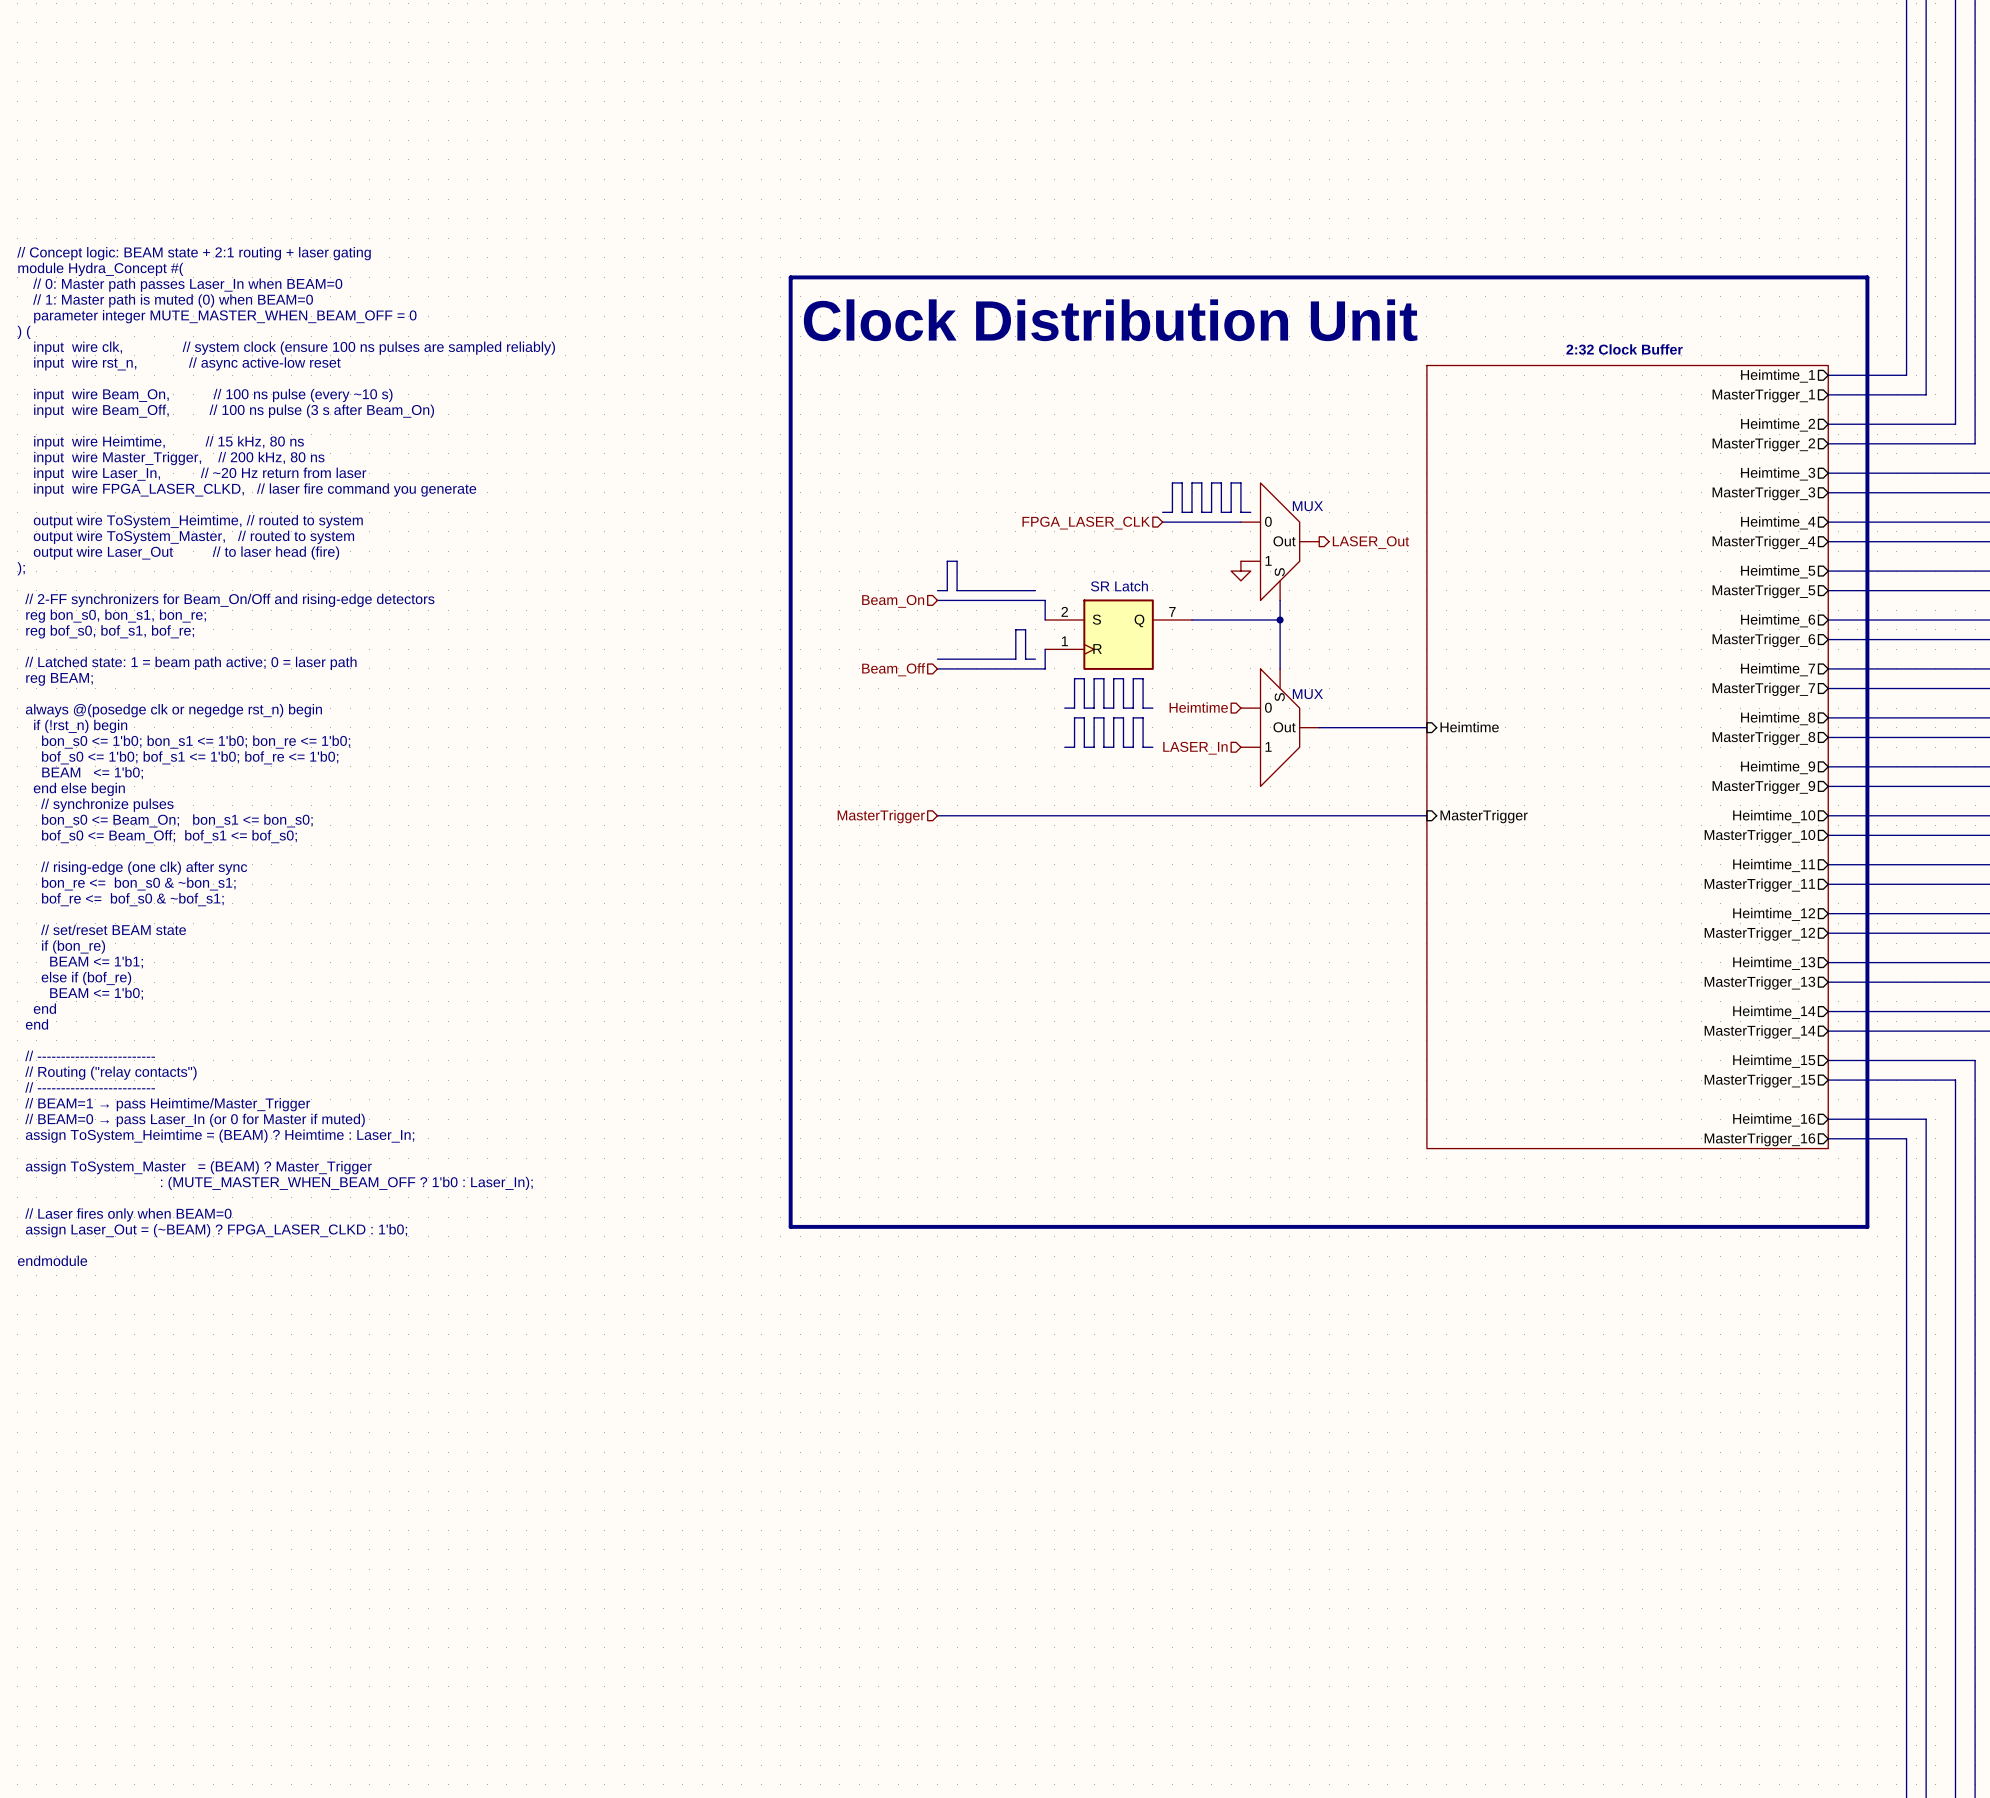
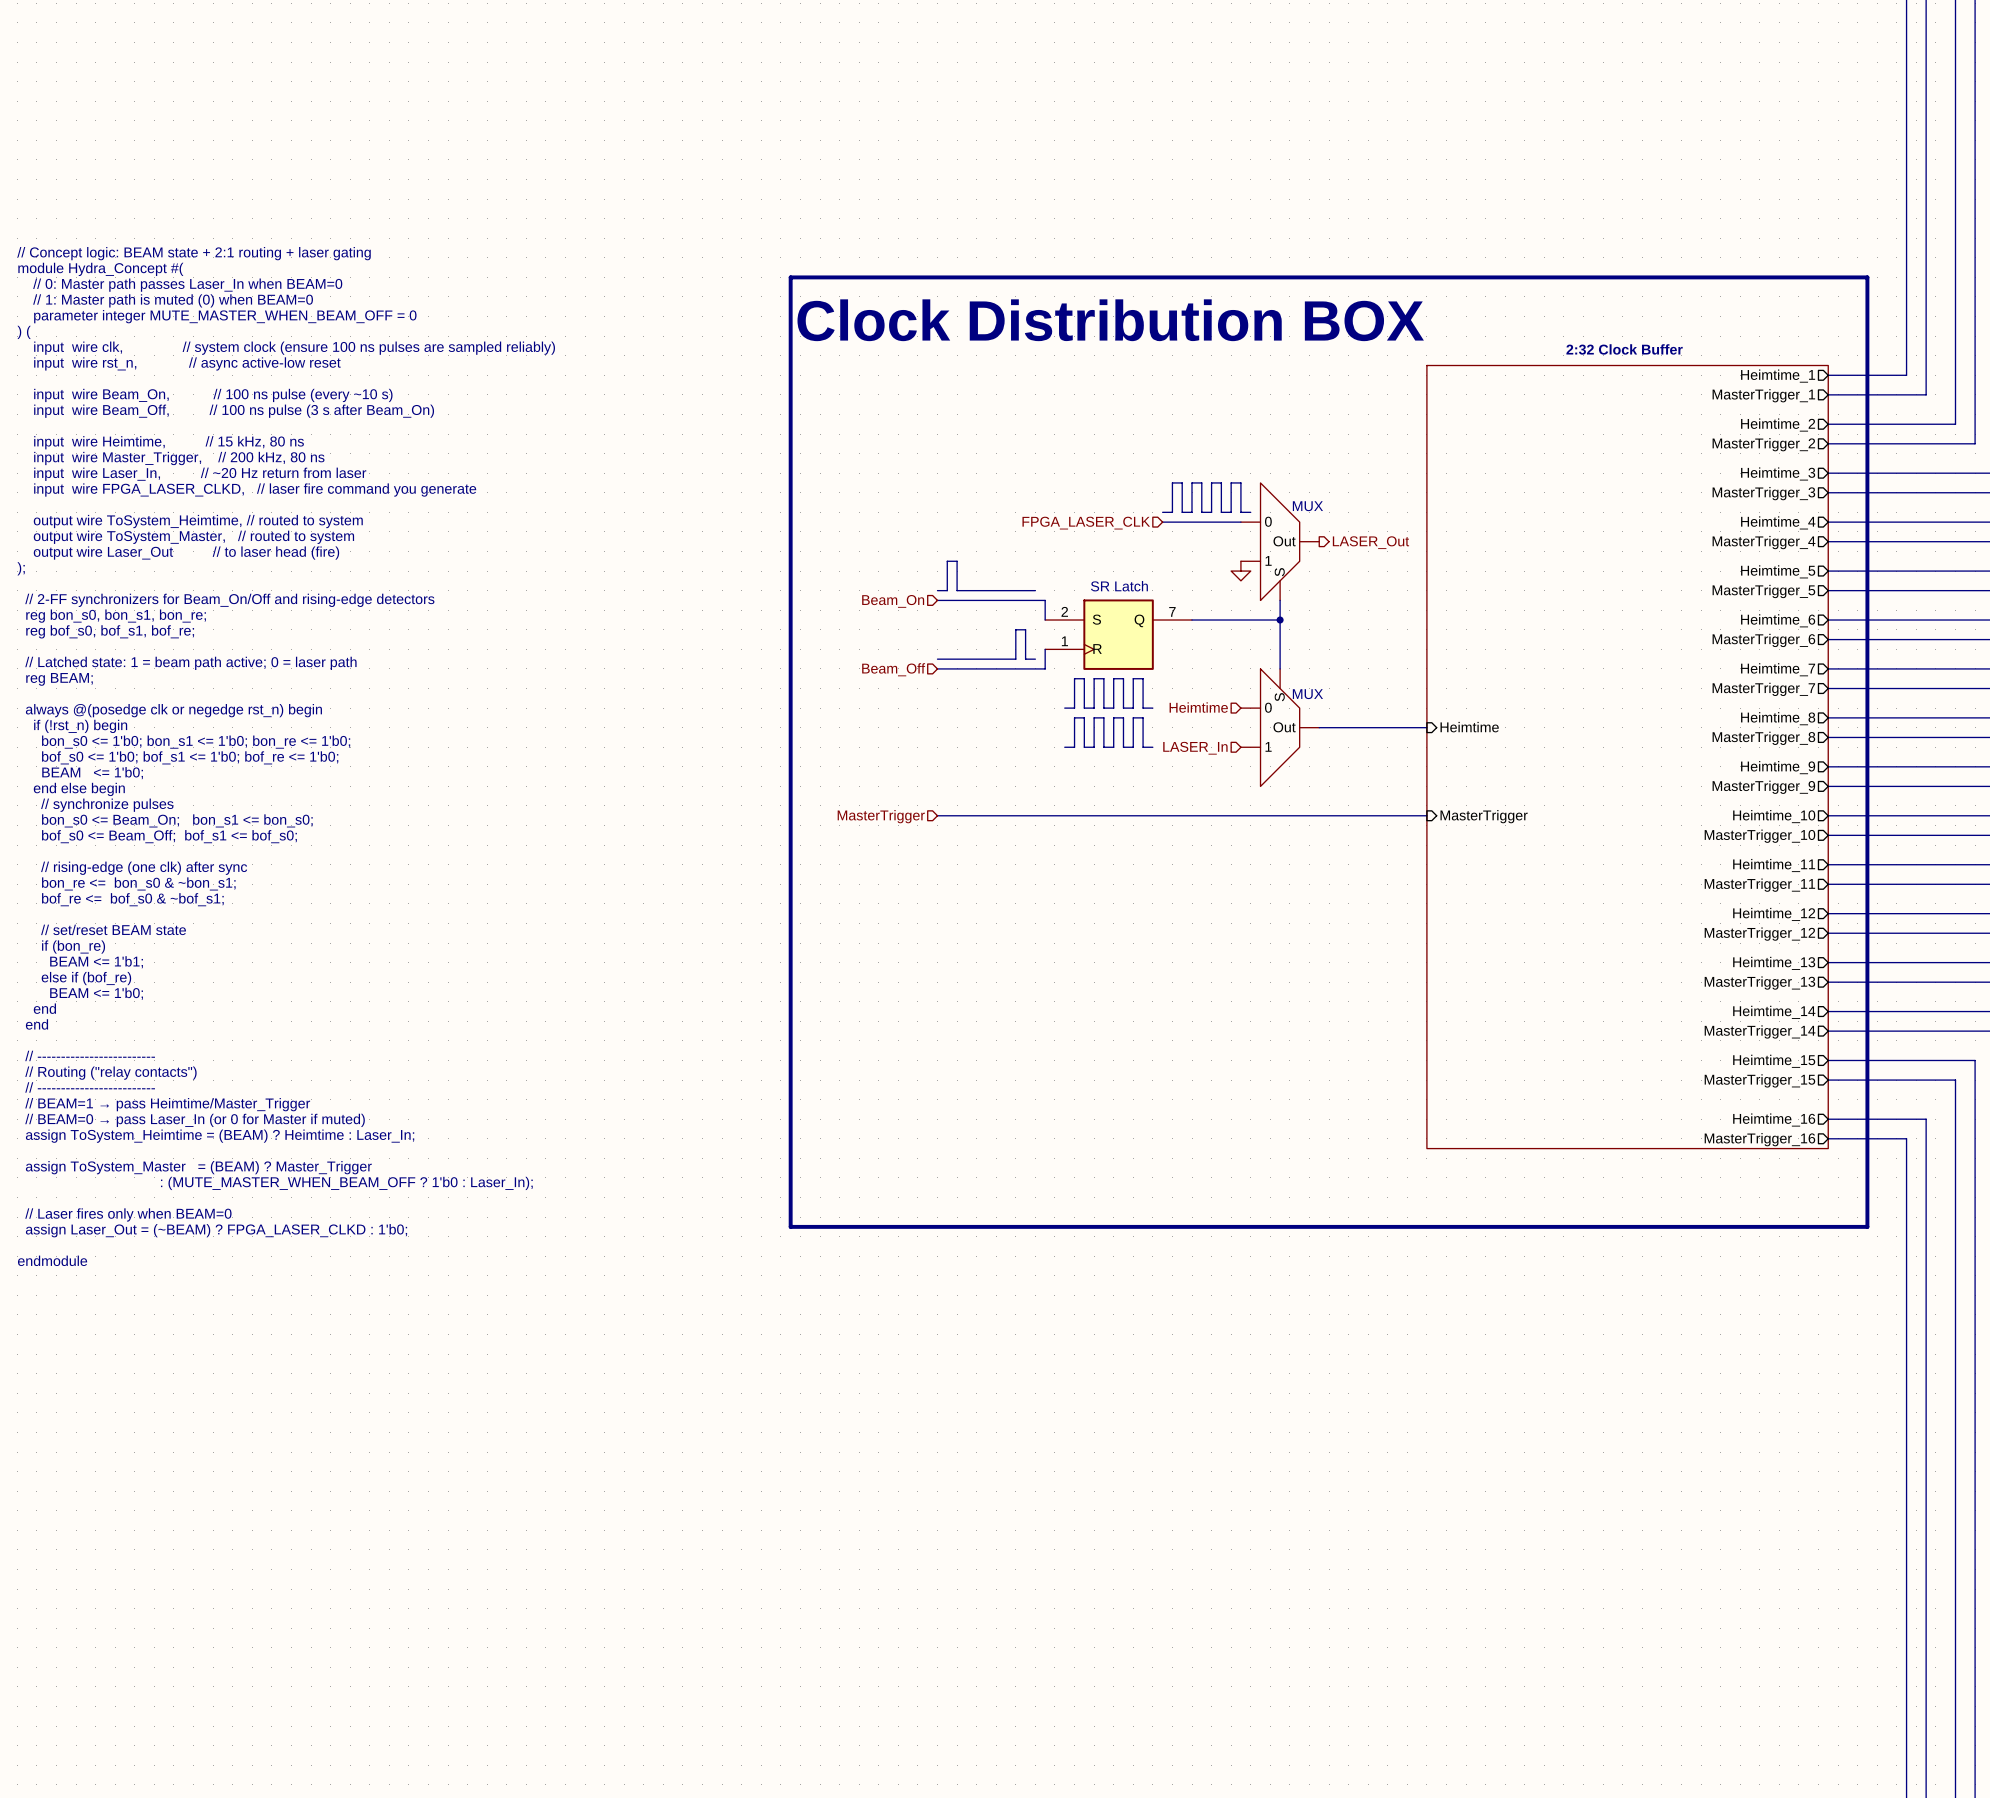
text: Clock Distribution Unit (1110, 320) -> Clock Distribution BOX (1110, 320)

